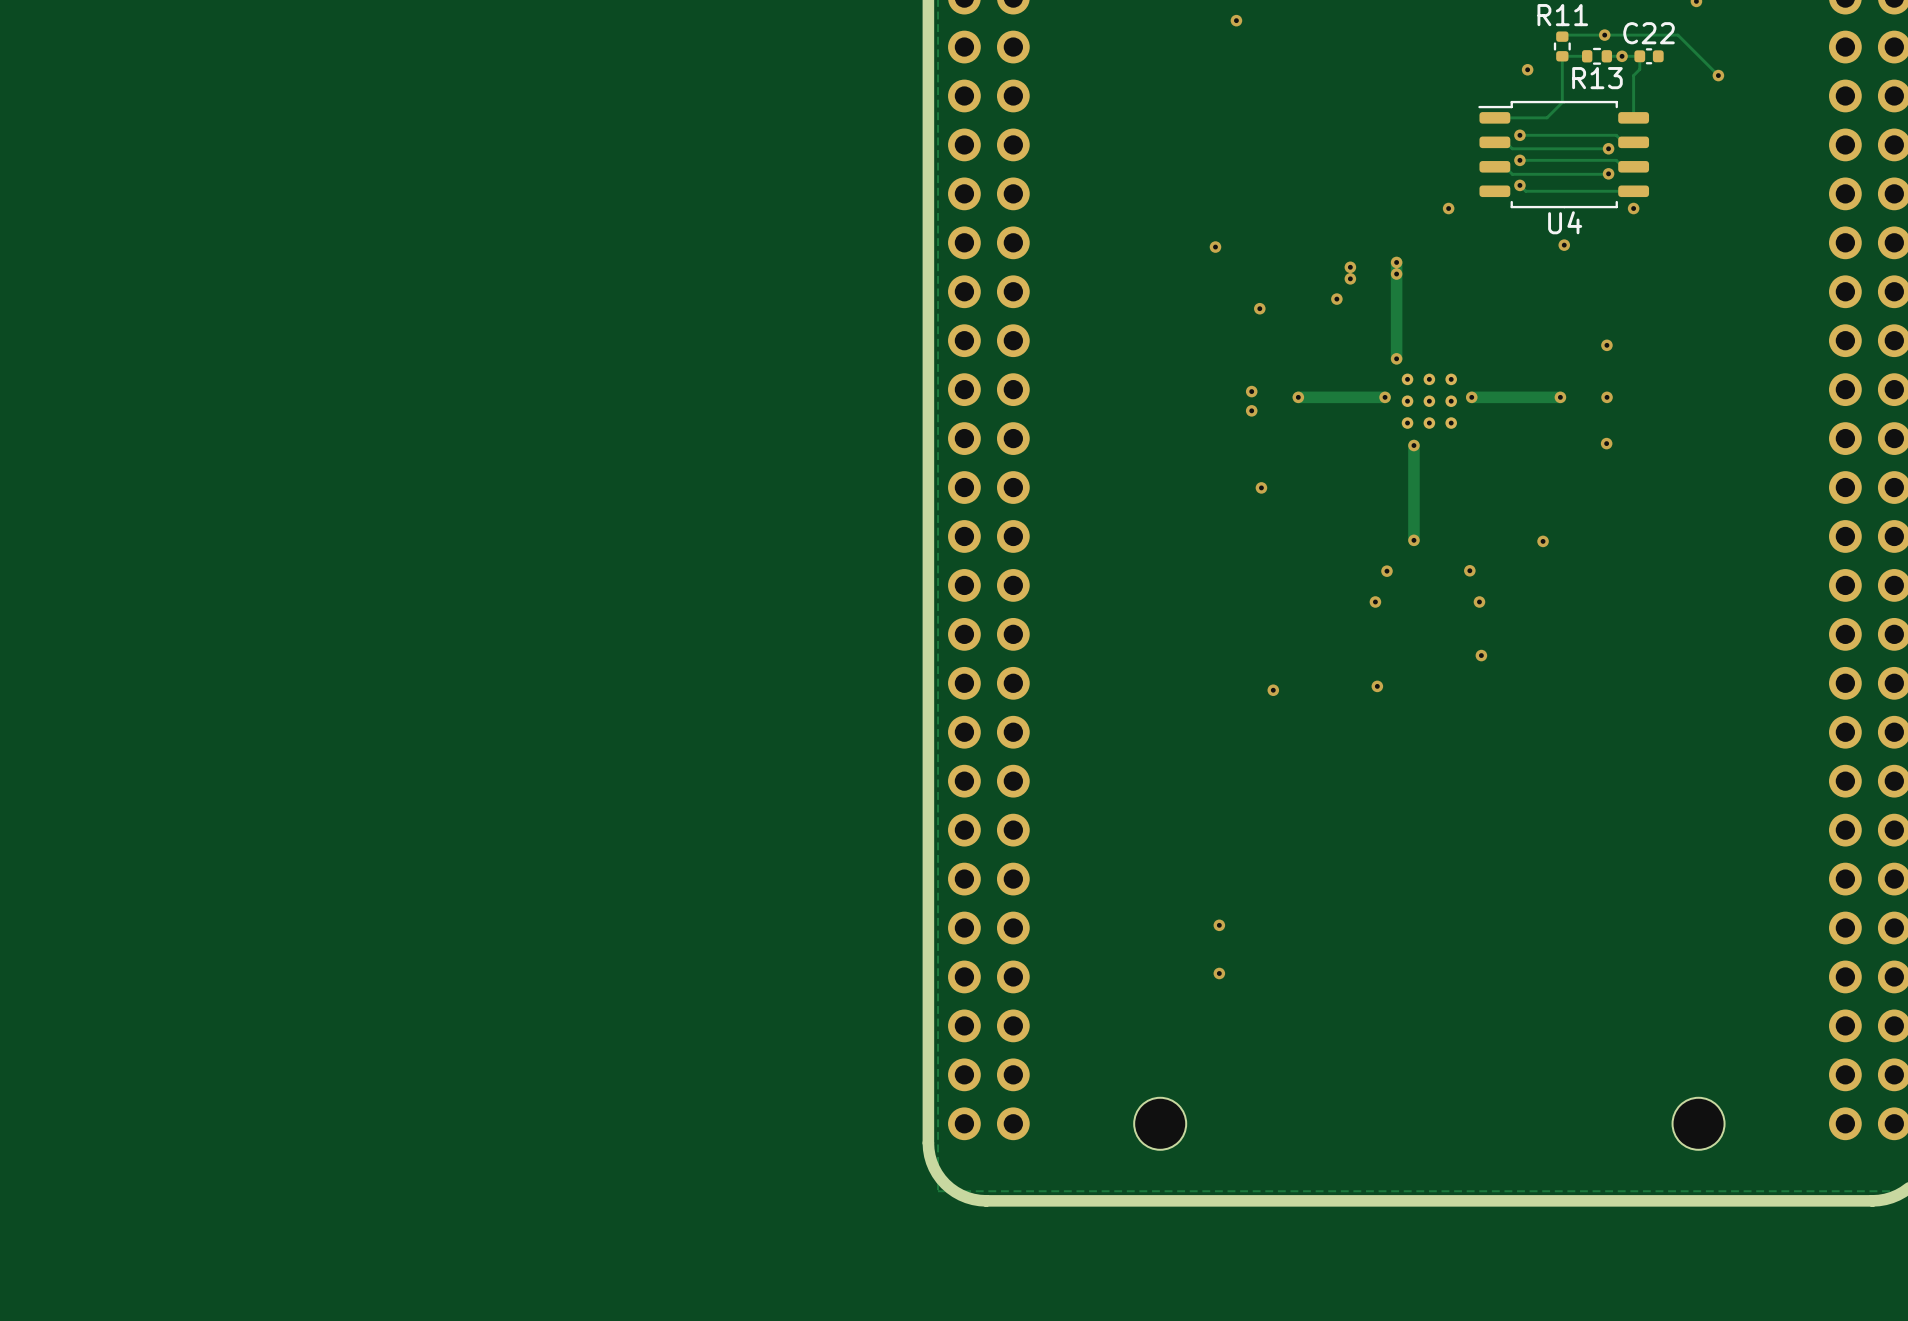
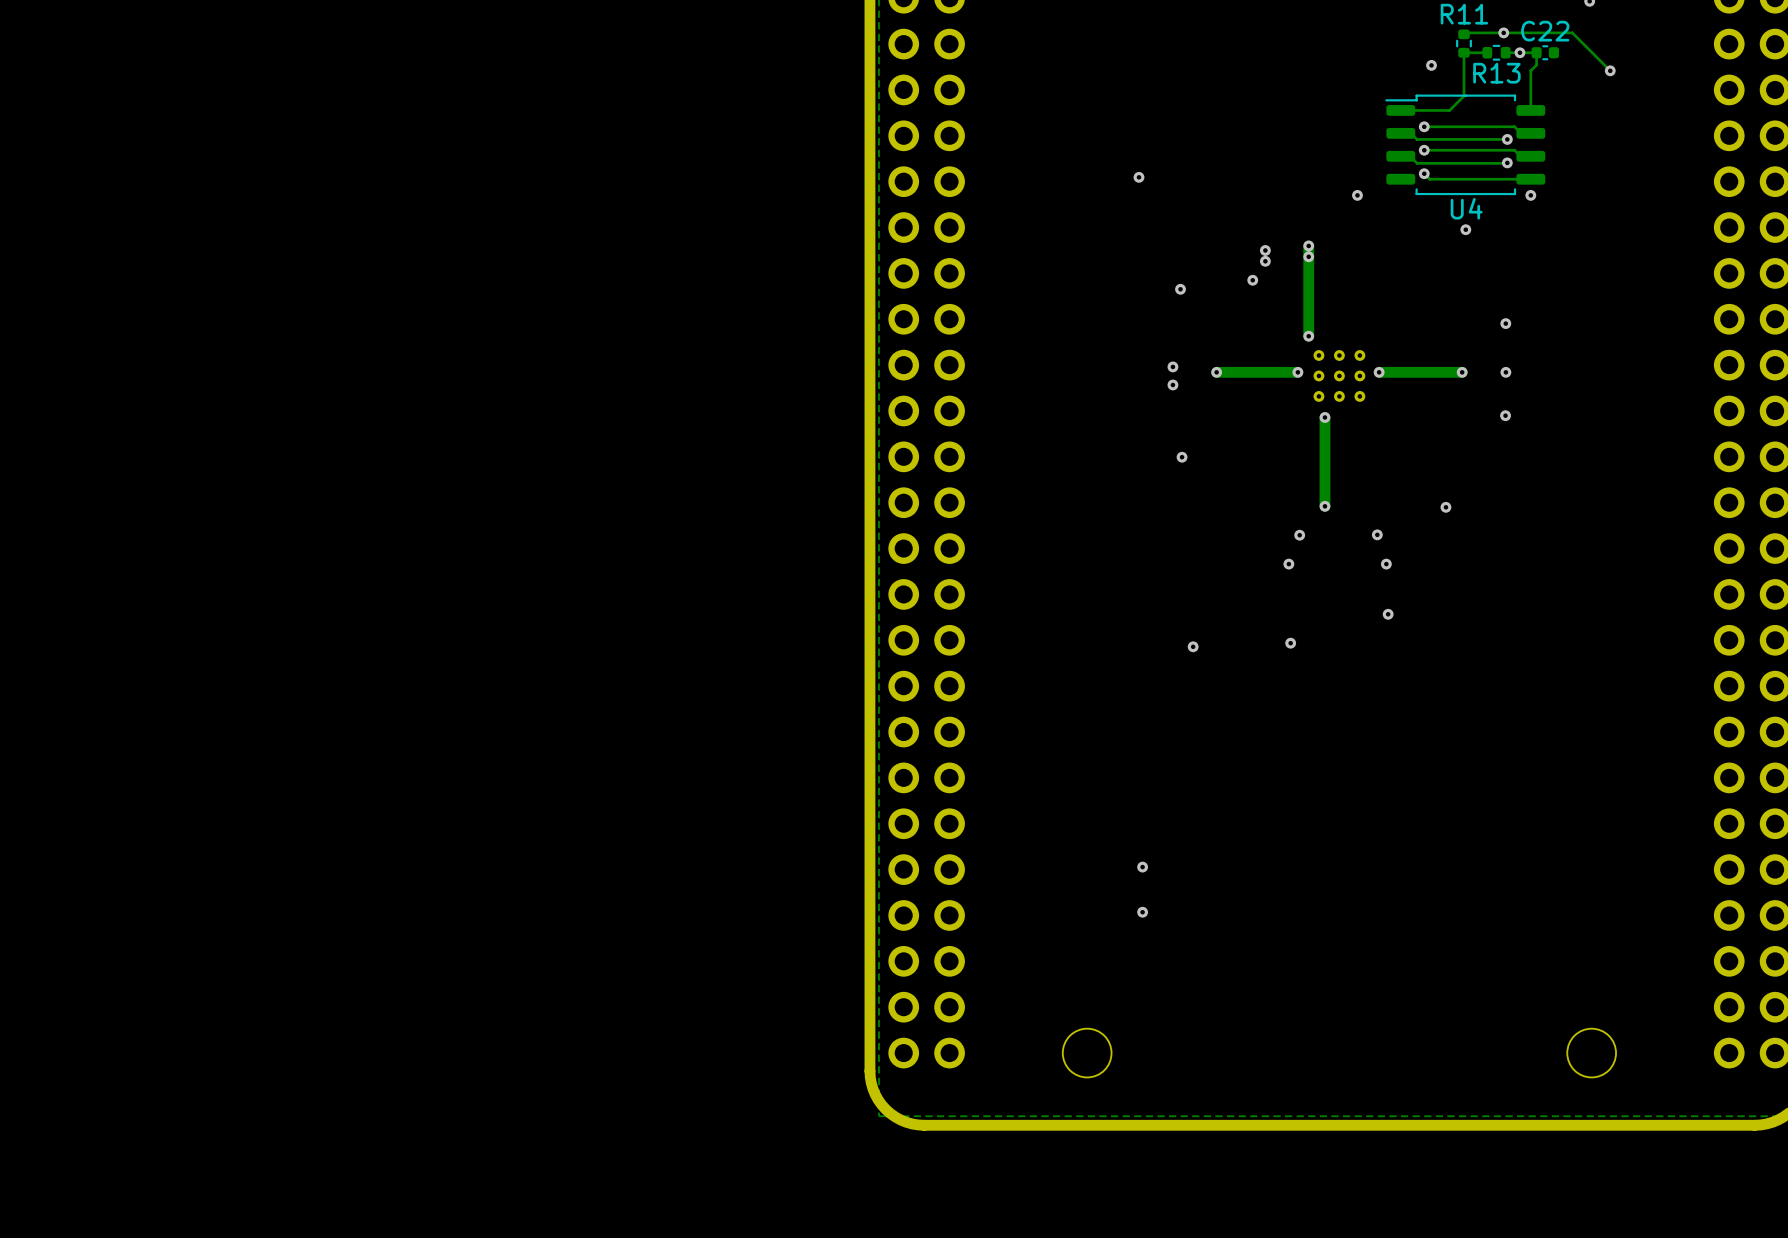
via: (1236, 20) -> none
via position: (1215, 247) -> (1138, 177)

